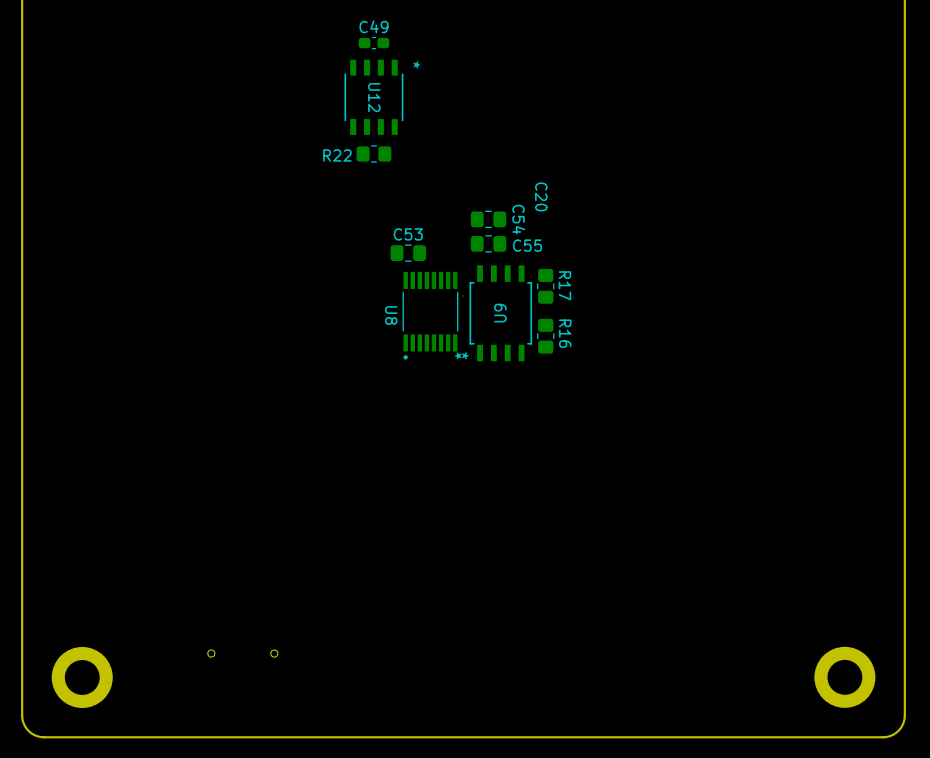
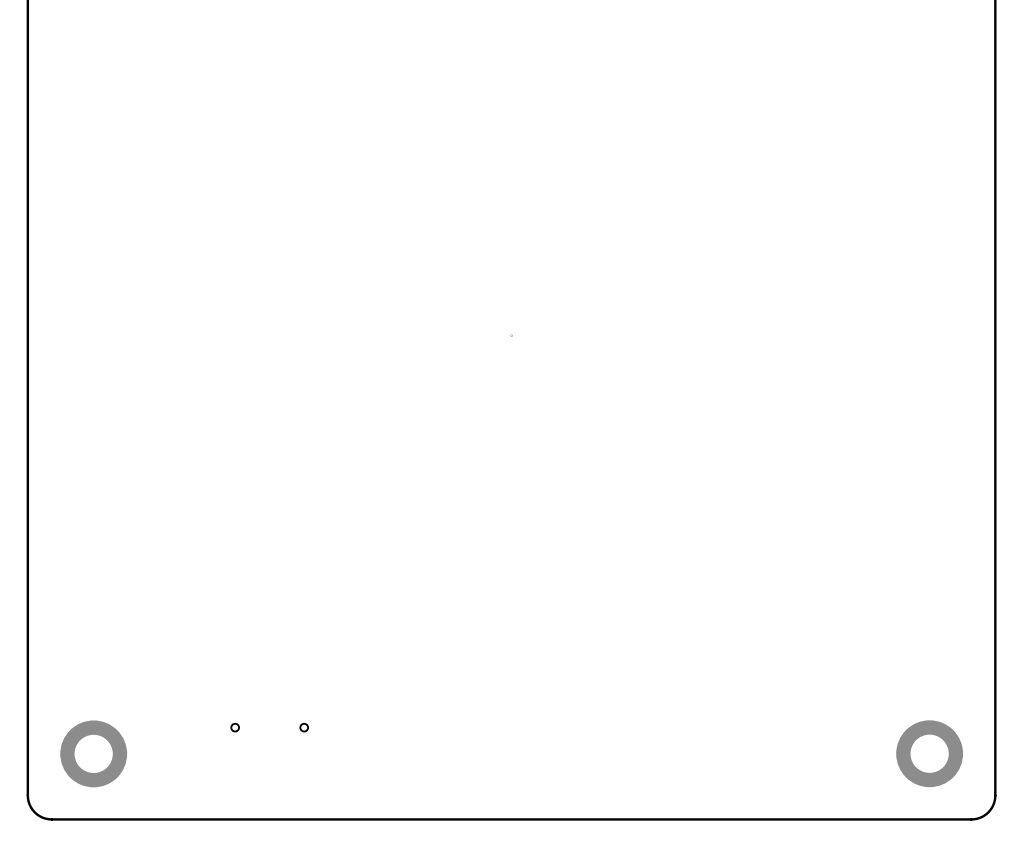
C49: (373, 43) -> none
U12: (373, 97) -> none
R22: (373, 153) -> none
C20: (541, 196) -> none
C54: (488, 219) -> none
C55: (488, 243) -> none
C53: (408, 253) -> none
R17: (545, 286) -> none
U9: (500, 313) -> none
U8: (430, 315) -> none
R16: (545, 336) -> none

